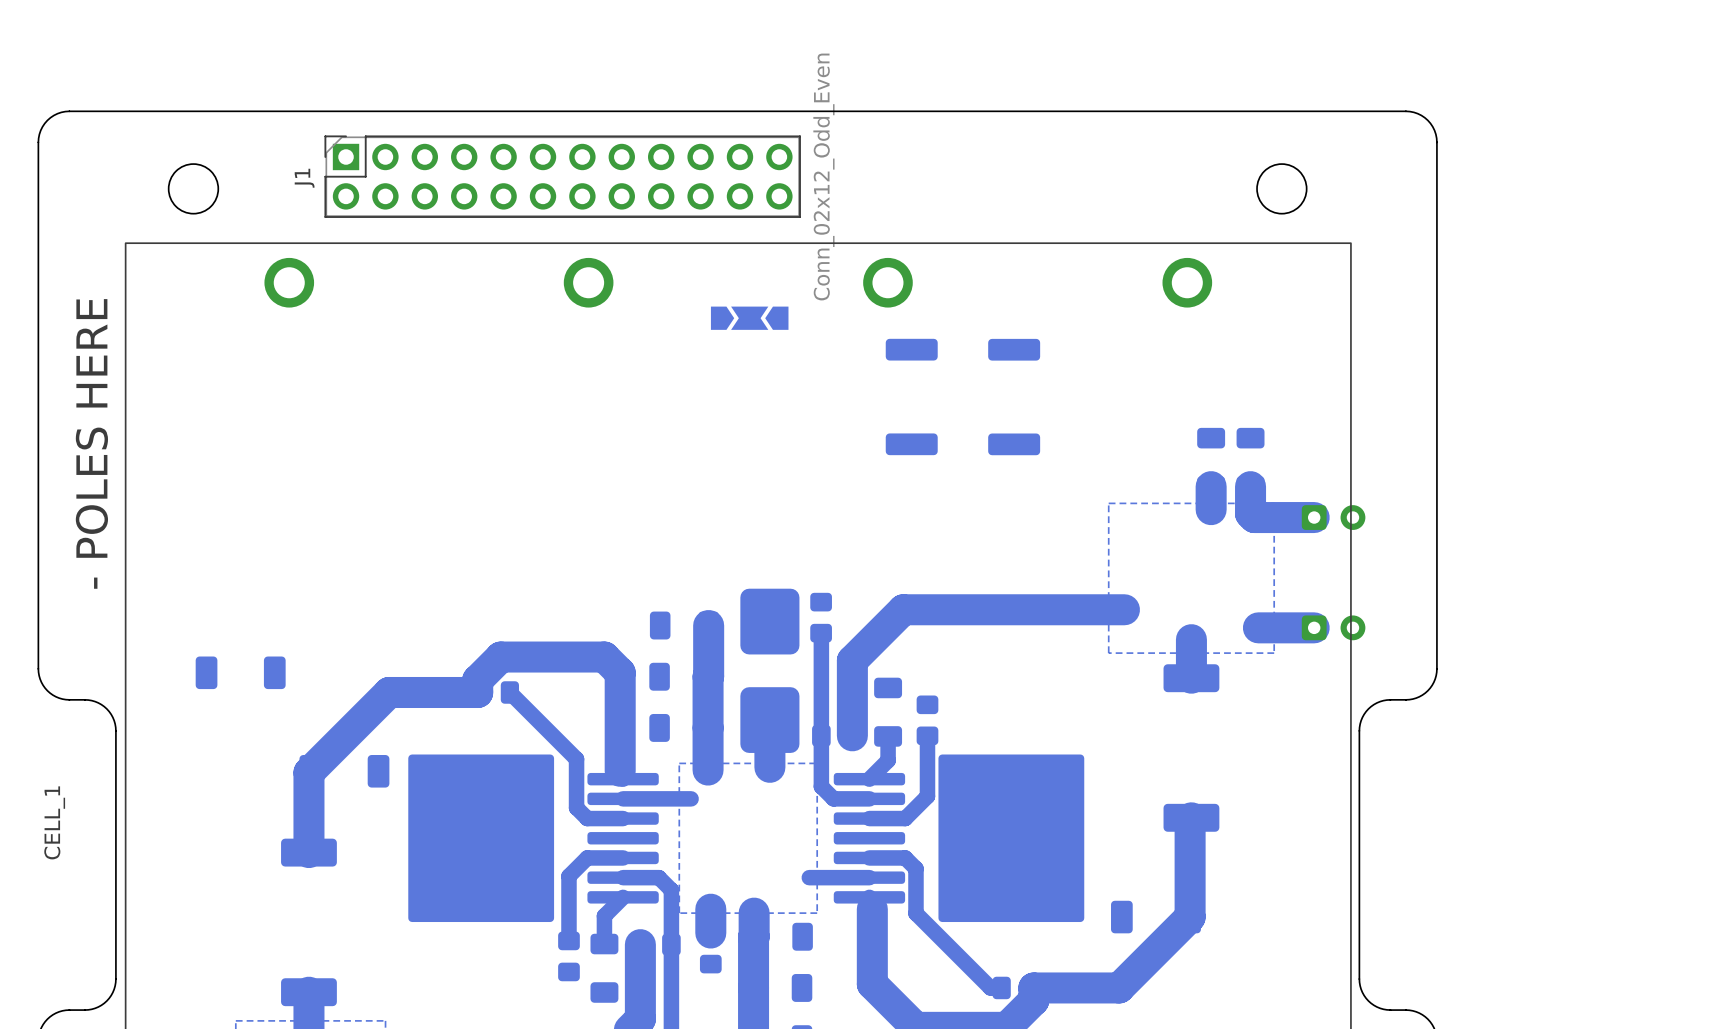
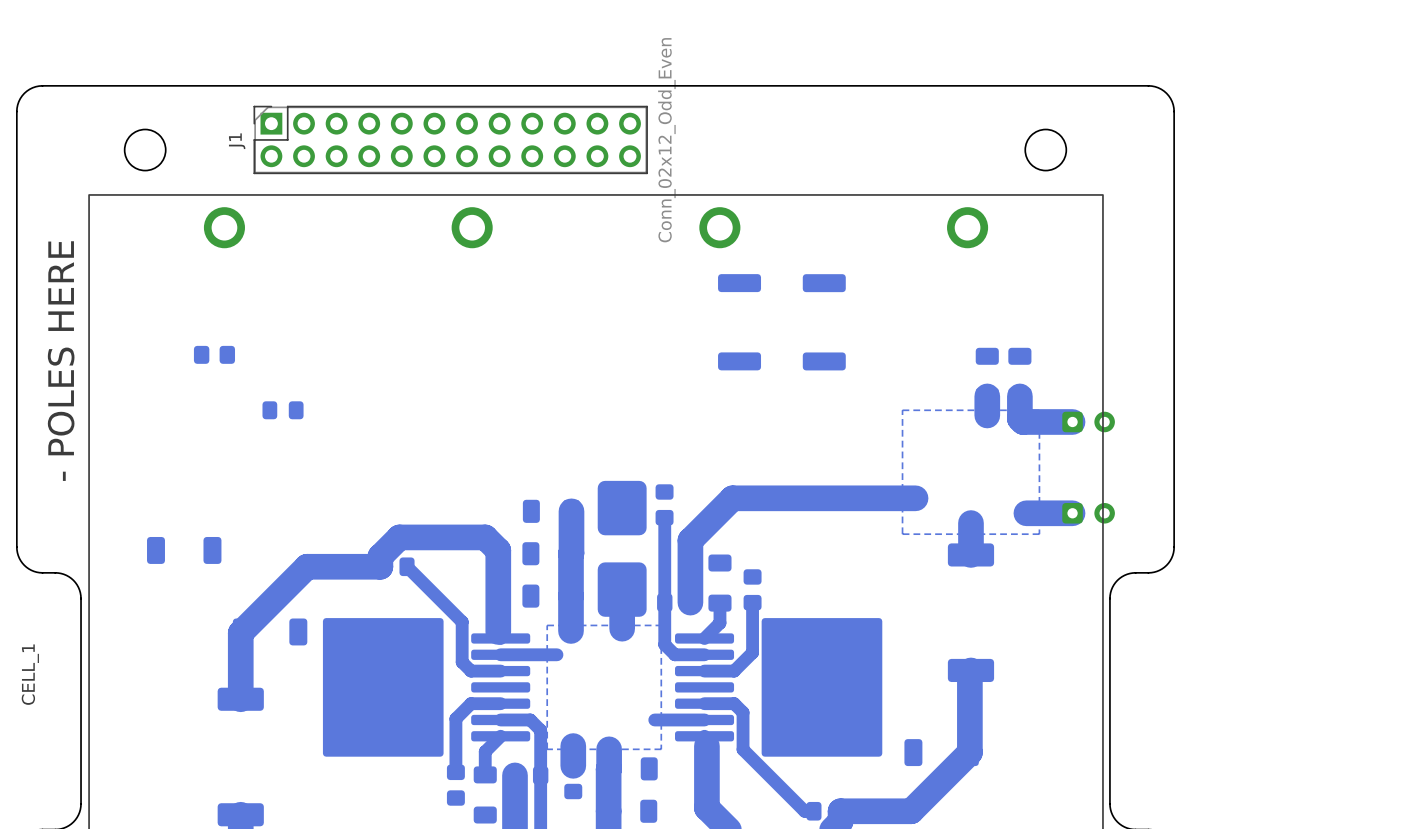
part: (749, 318) -> none
part: none -> (214, 354)
part: none -> (283, 410)

